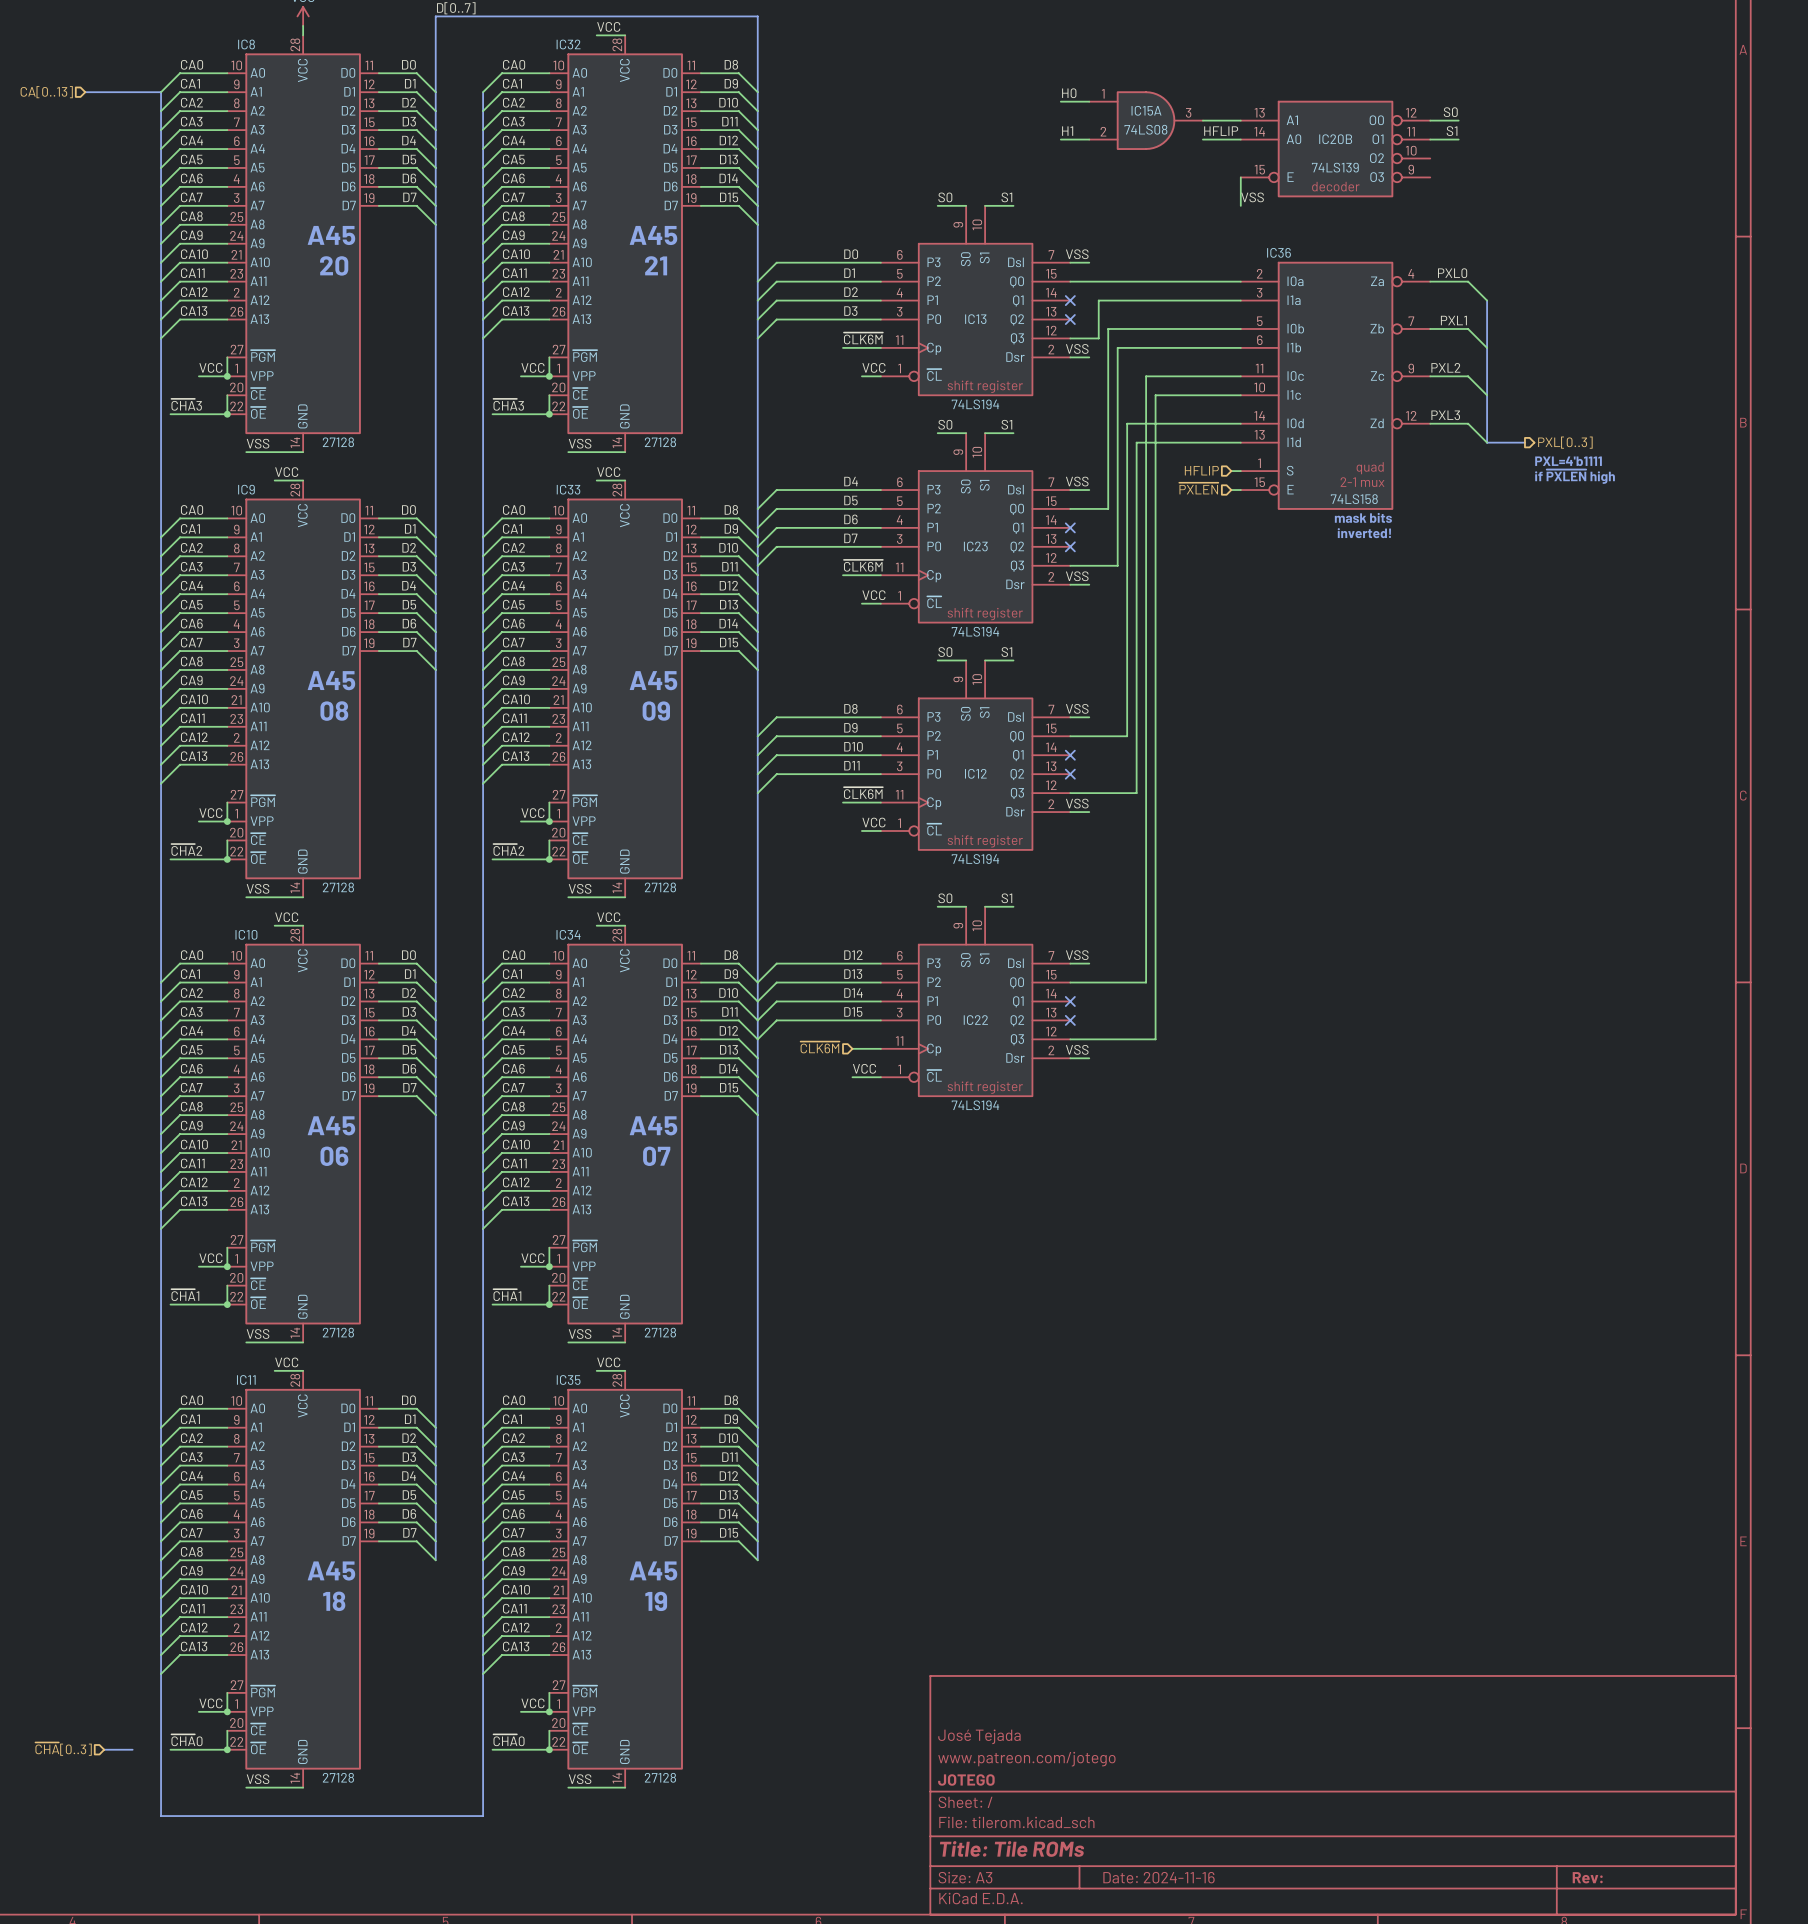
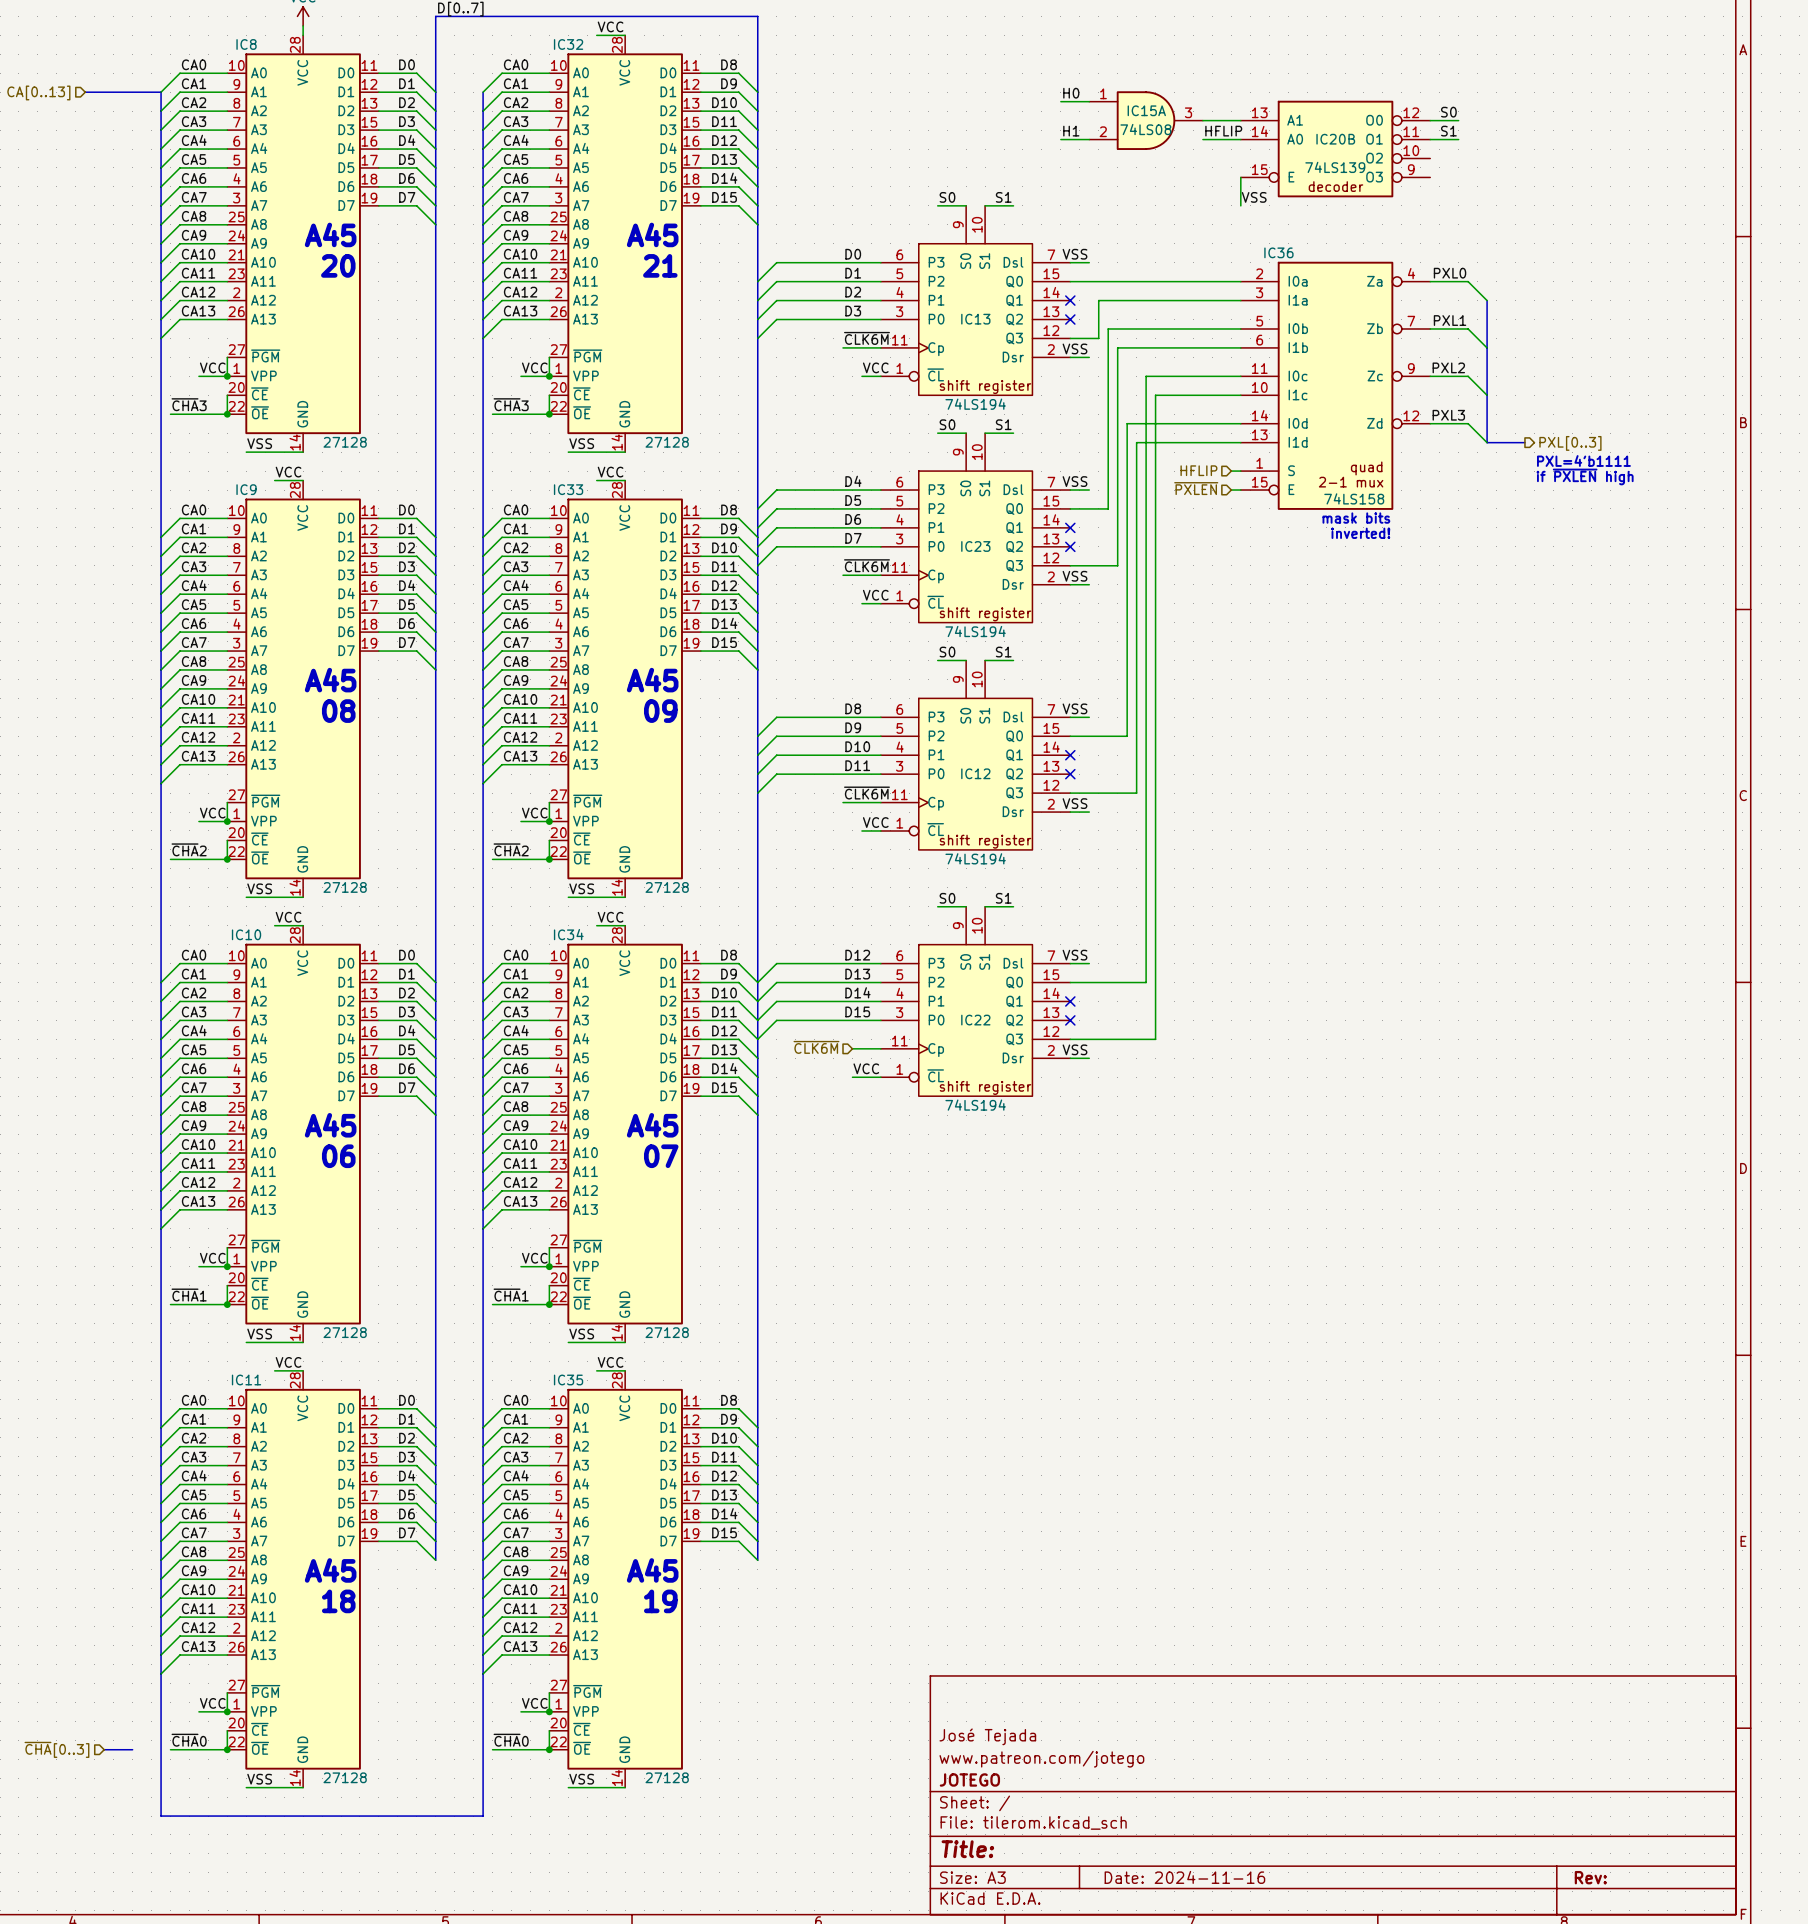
title block: Title: Tile ROMs (1012, 1848) -> Title: (967, 1849)

